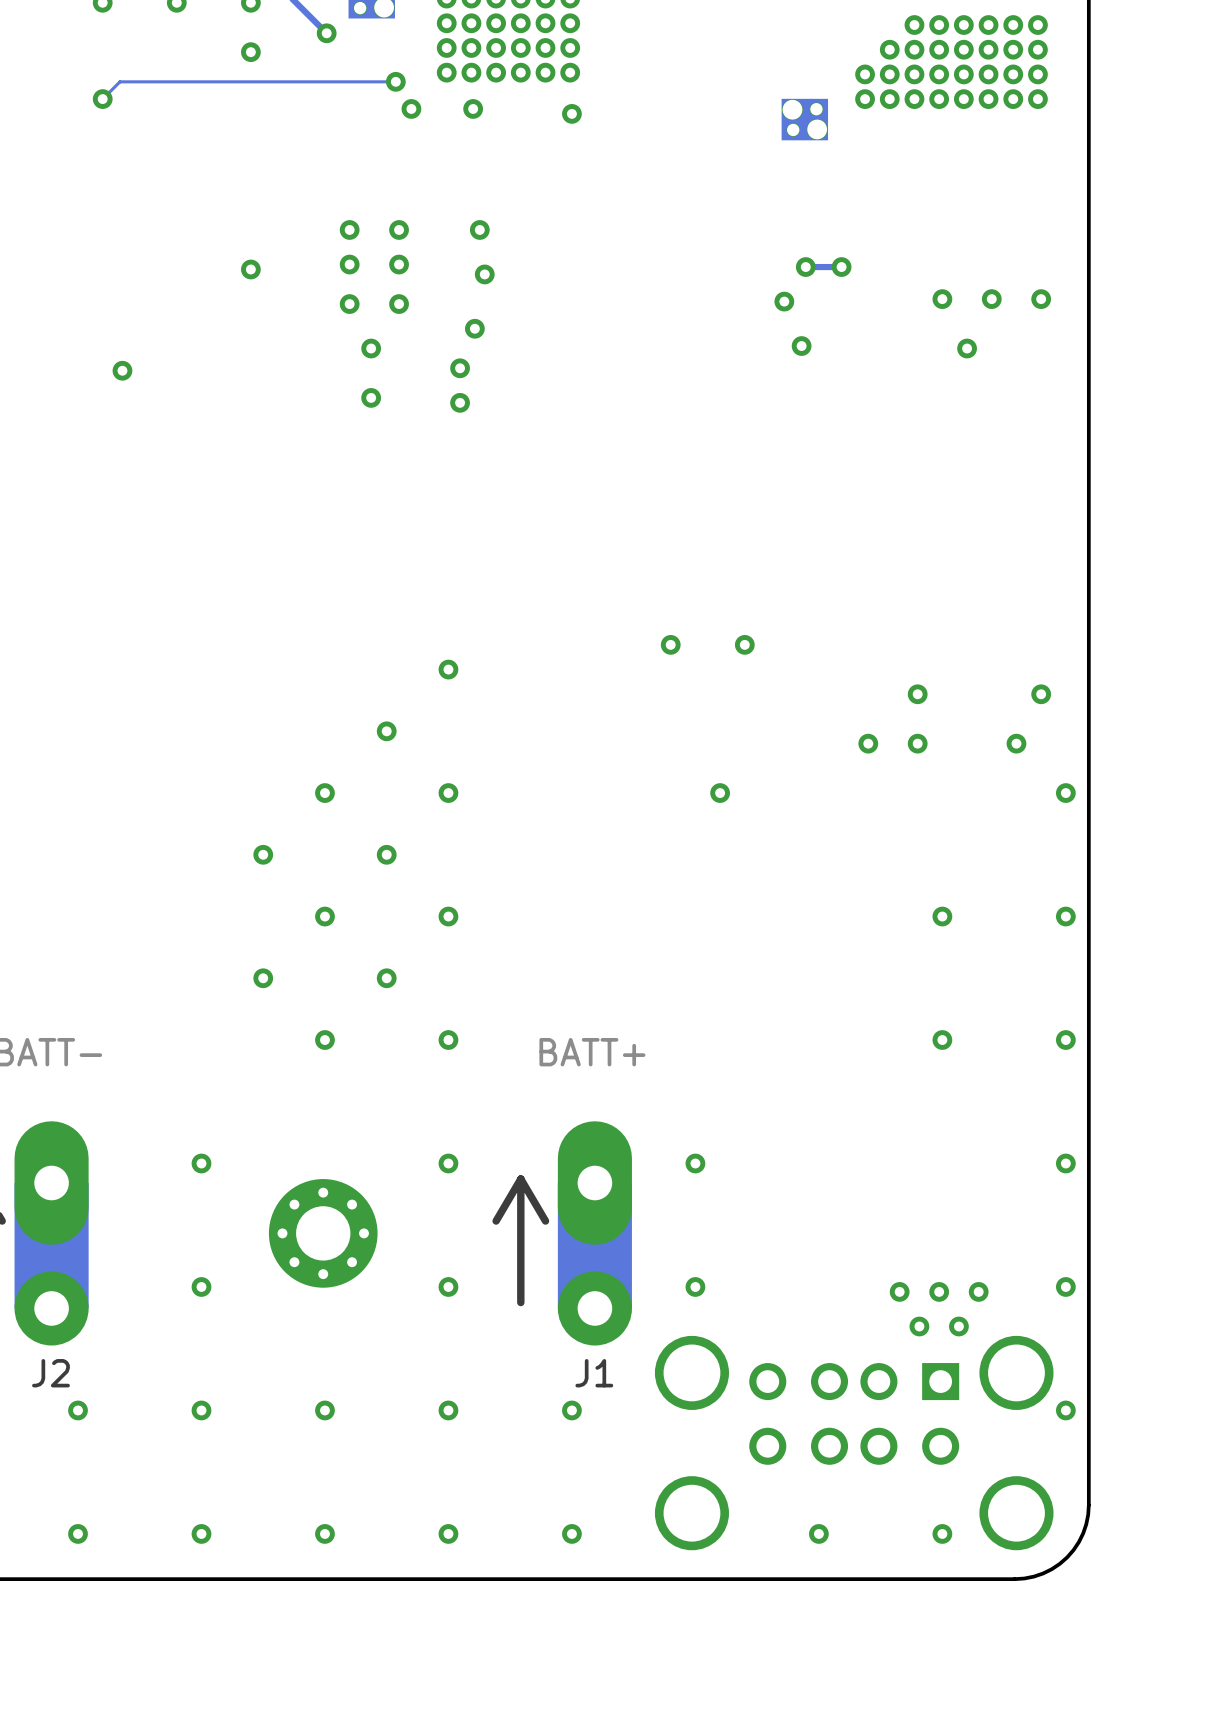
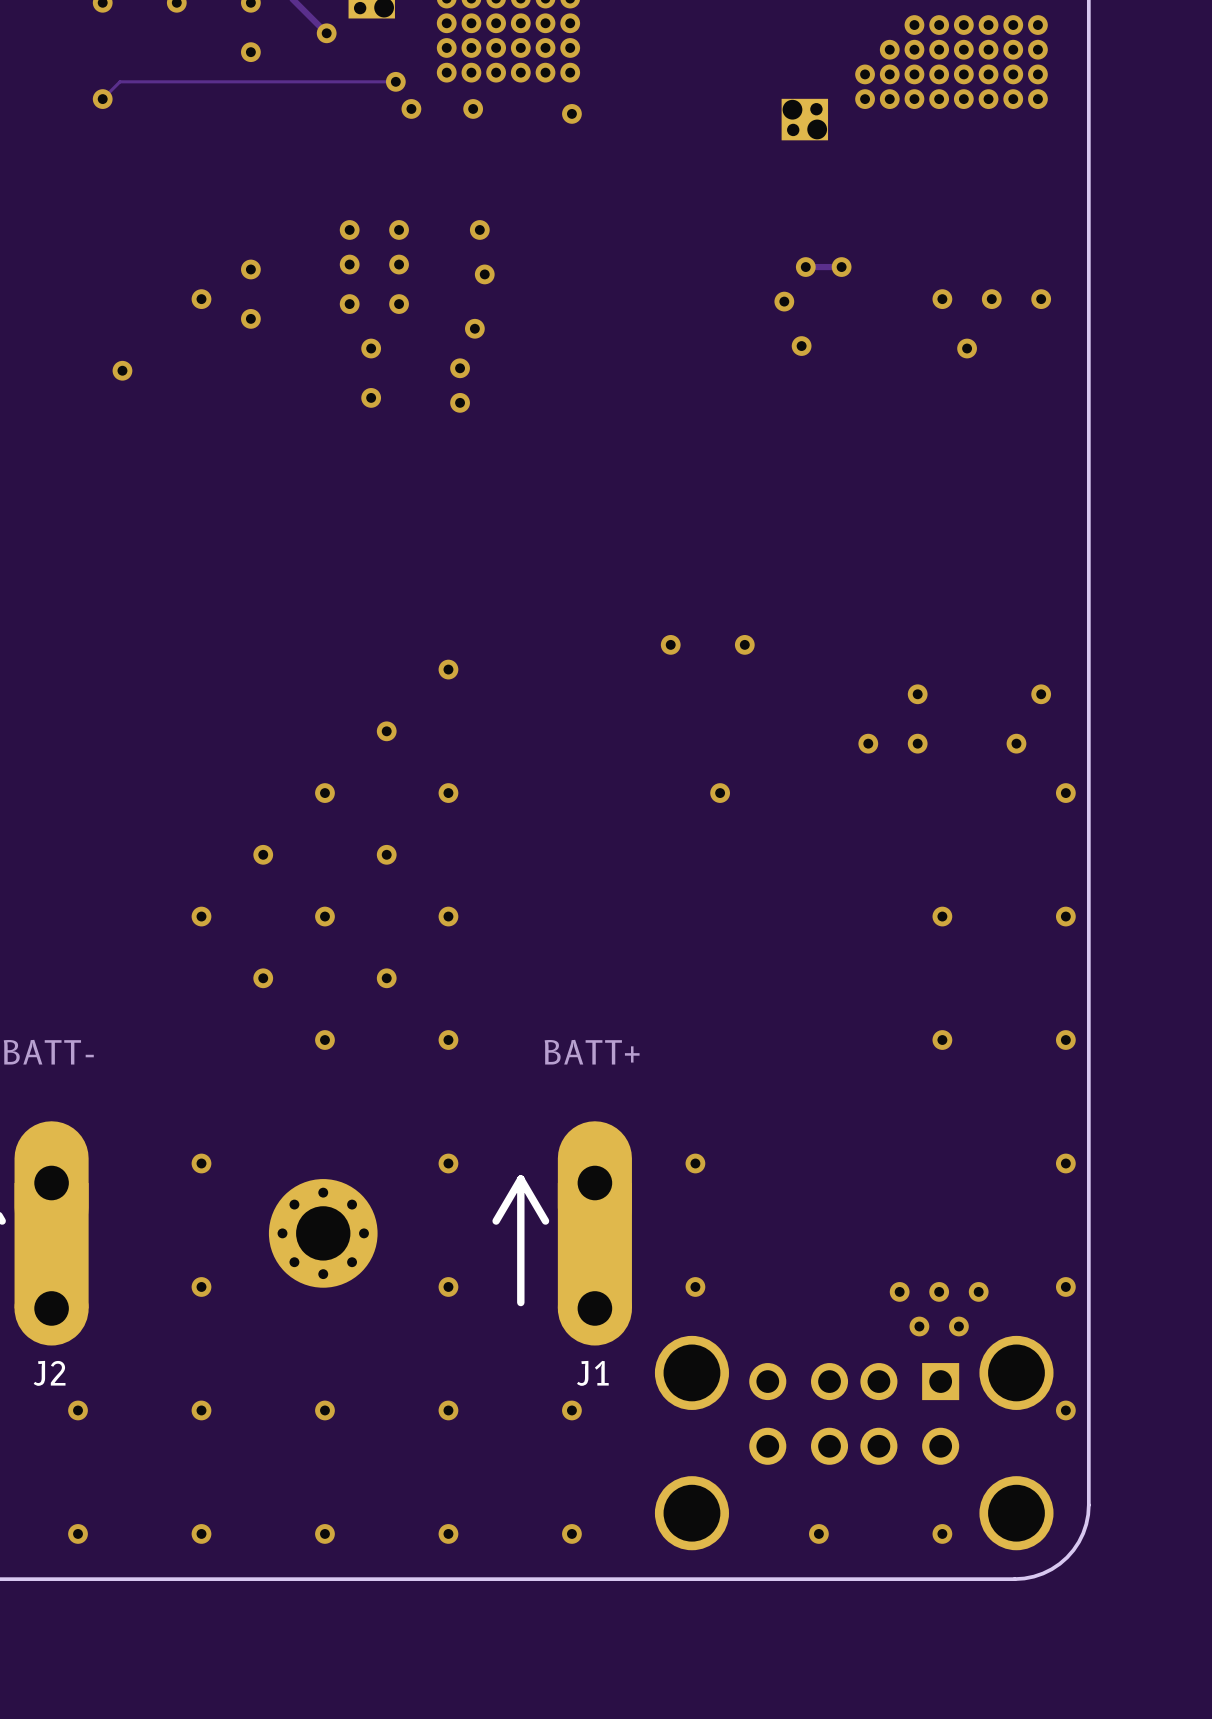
via: none -> (201, 299)
via: none -> (250, 318)
via: none -> (201, 916)

